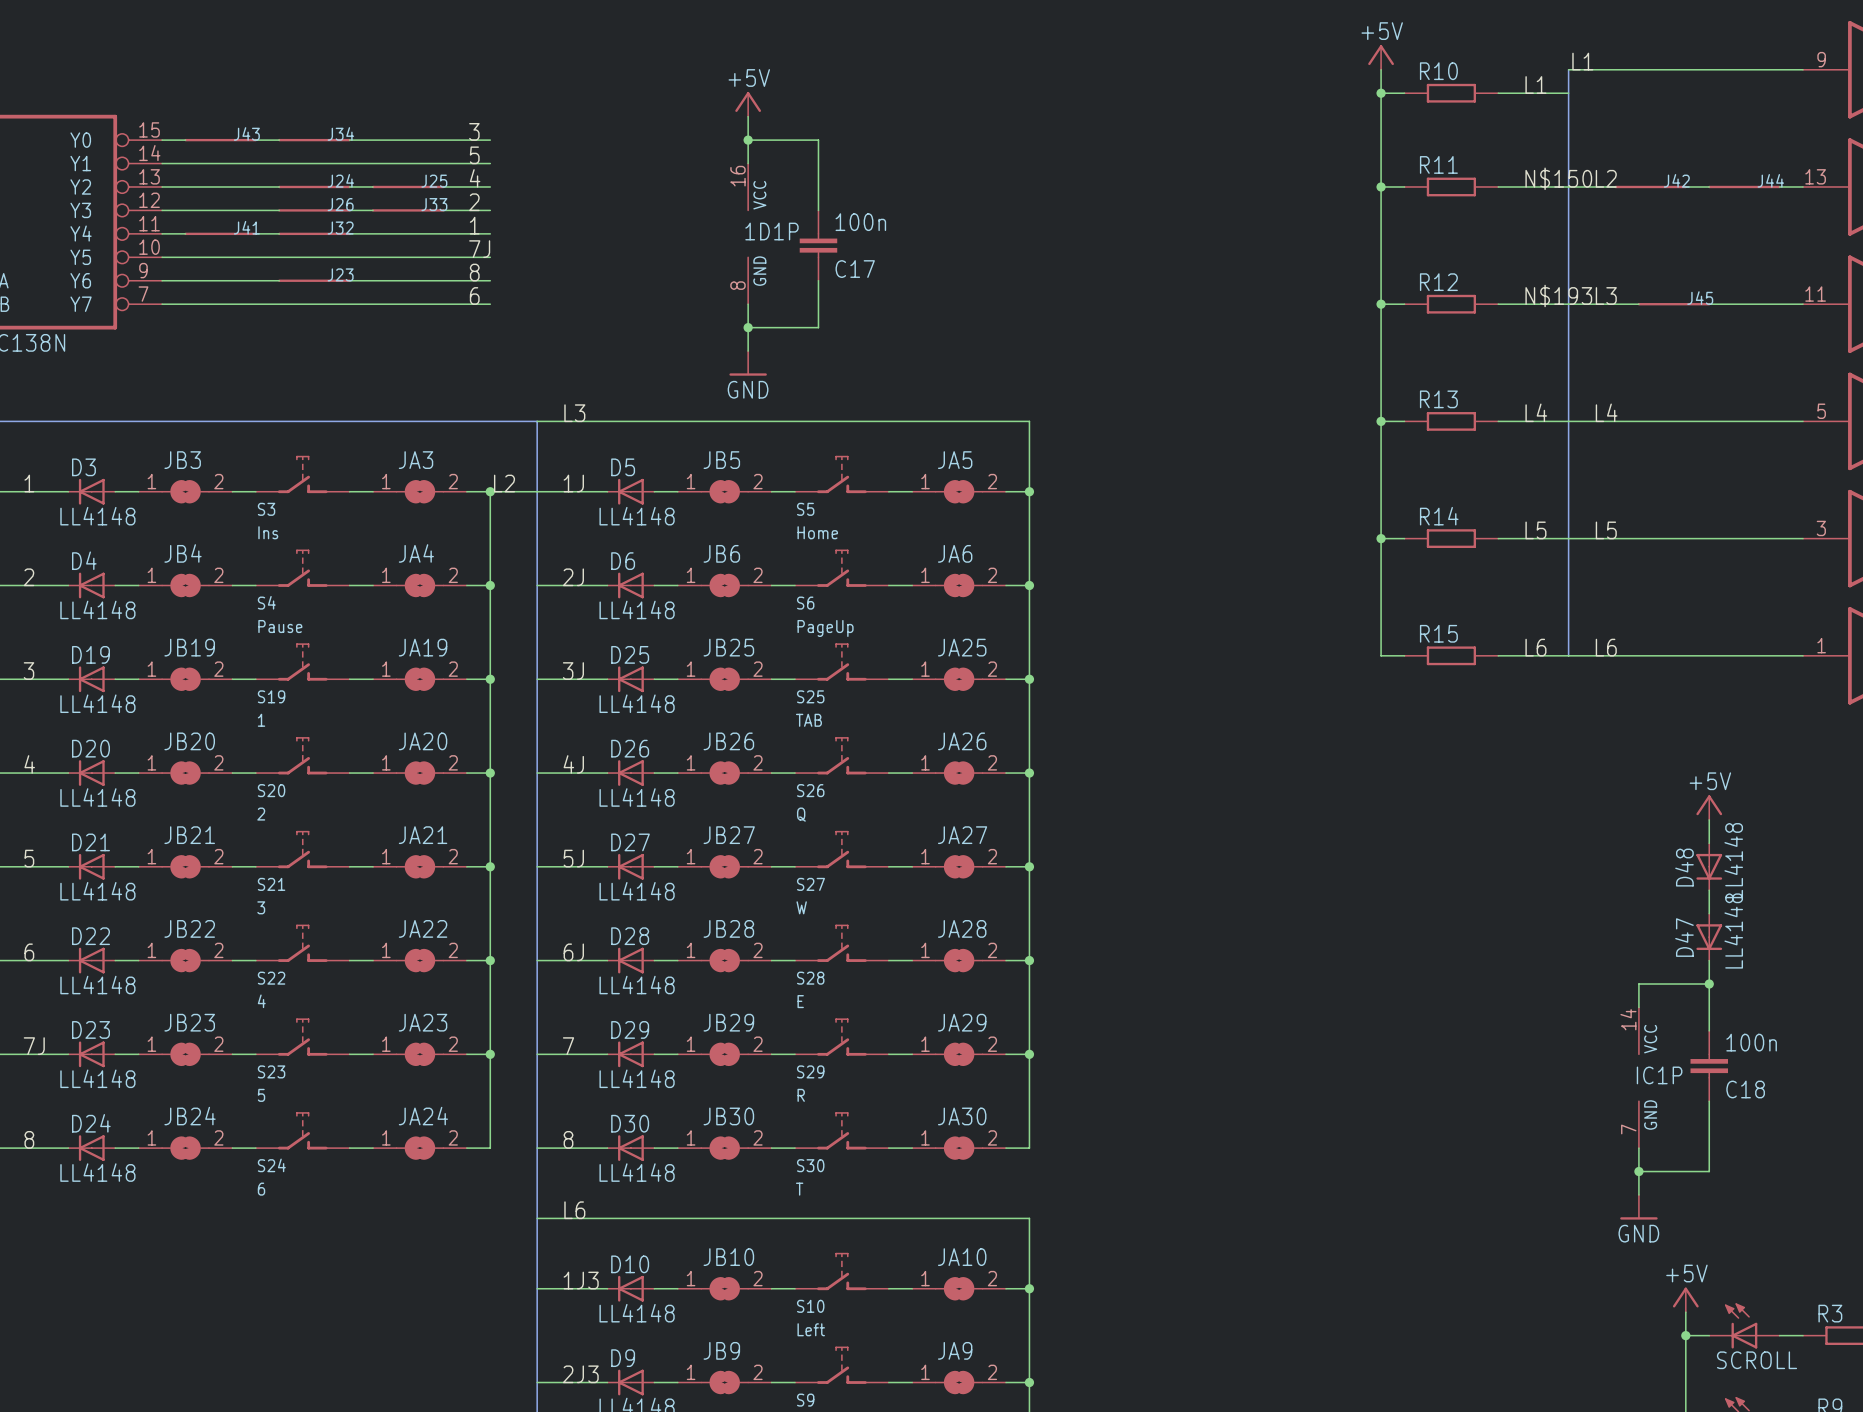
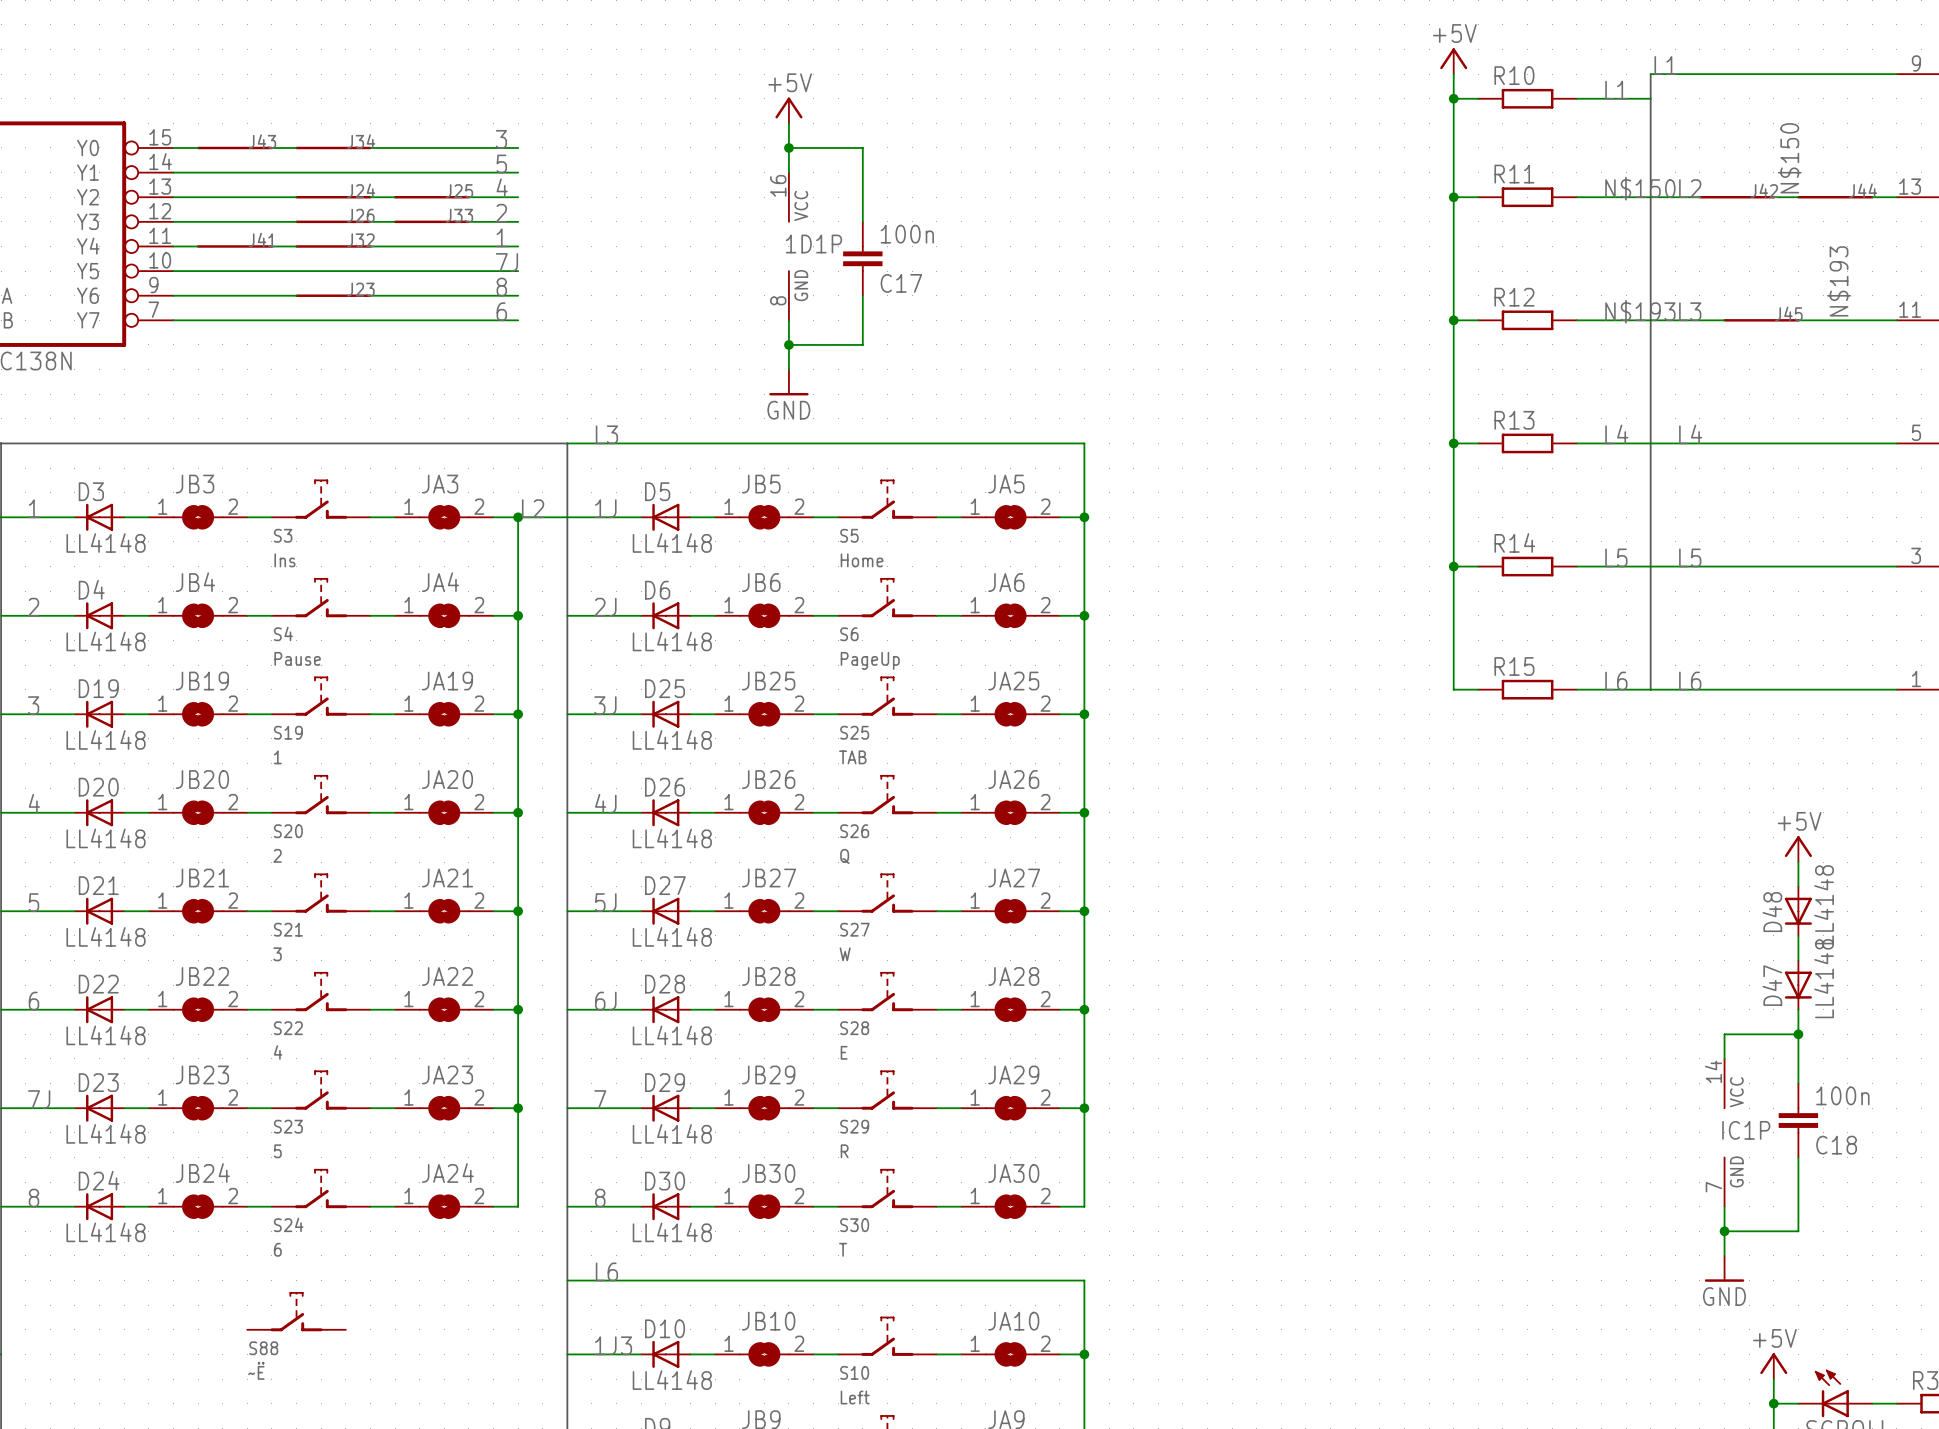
label: none -> N$150 (1789, 158)
label: none -> N$193 (1839, 281)
S88: none -> ~Ё (296, 1311)

